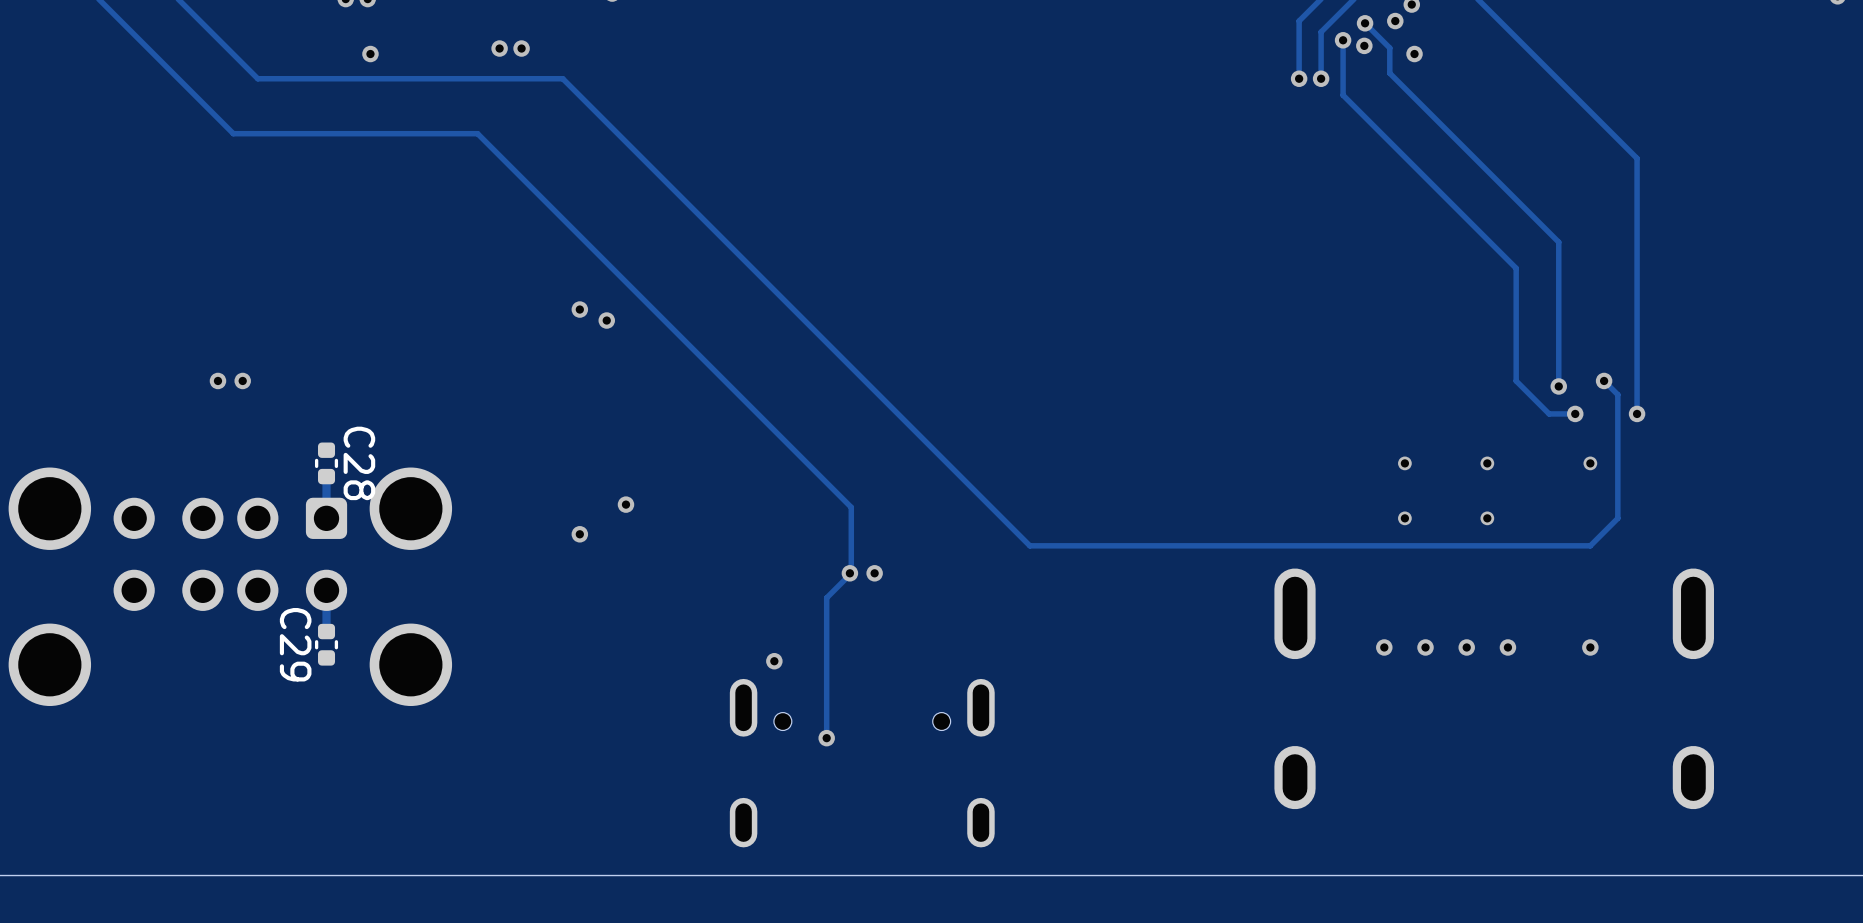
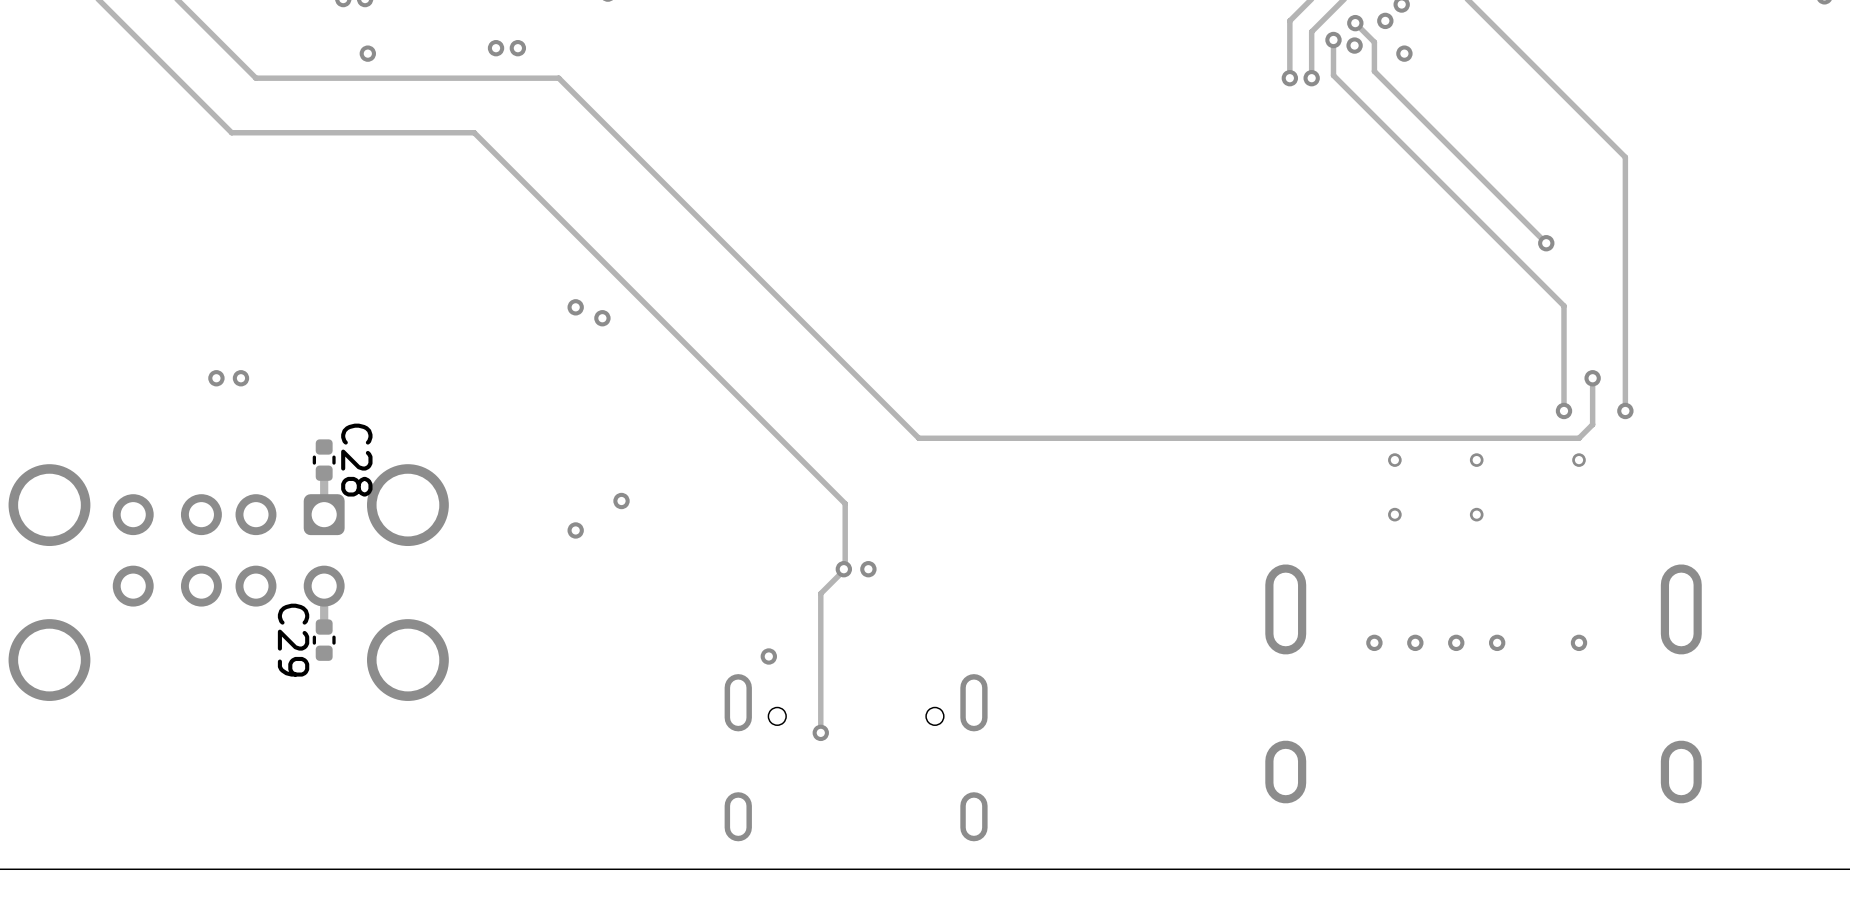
track: (1384, 42) (1389, 48) (1389, 73) (1558, 242) (1558, 386) -> (1374, 42) (1374, 71) (1546, 243)
track: (1343, 76) (1343, 95) (1516, 268) (1516, 380) (1549, 413) (1575, 413) -> (1333, 75) (1563, 305) (1563, 410)
track: (1604, 380) (1617, 394) (1617, 518) (1590, 545) (1029, 545) (925, 441) -> (1592, 378) (1592, 424) (1579, 438) (918, 438)
via position: (1558, 386) -> (1546, 243)

